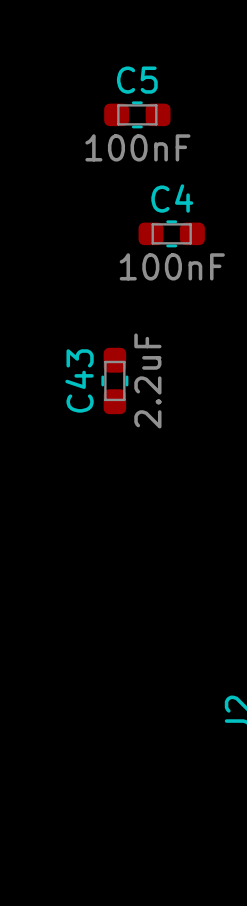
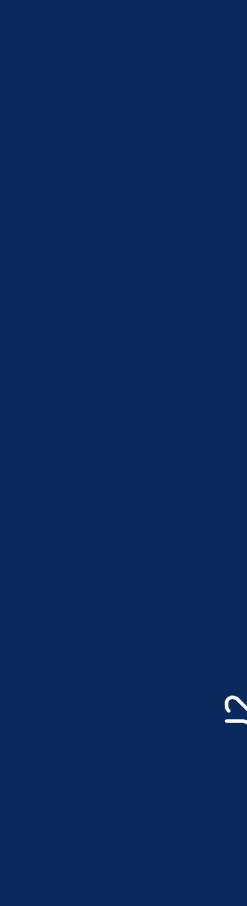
C5: 100nF (137, 114) -> none
C4: 100nF (171, 233) -> none
C43: 2.2uF (114, 380) -> none

